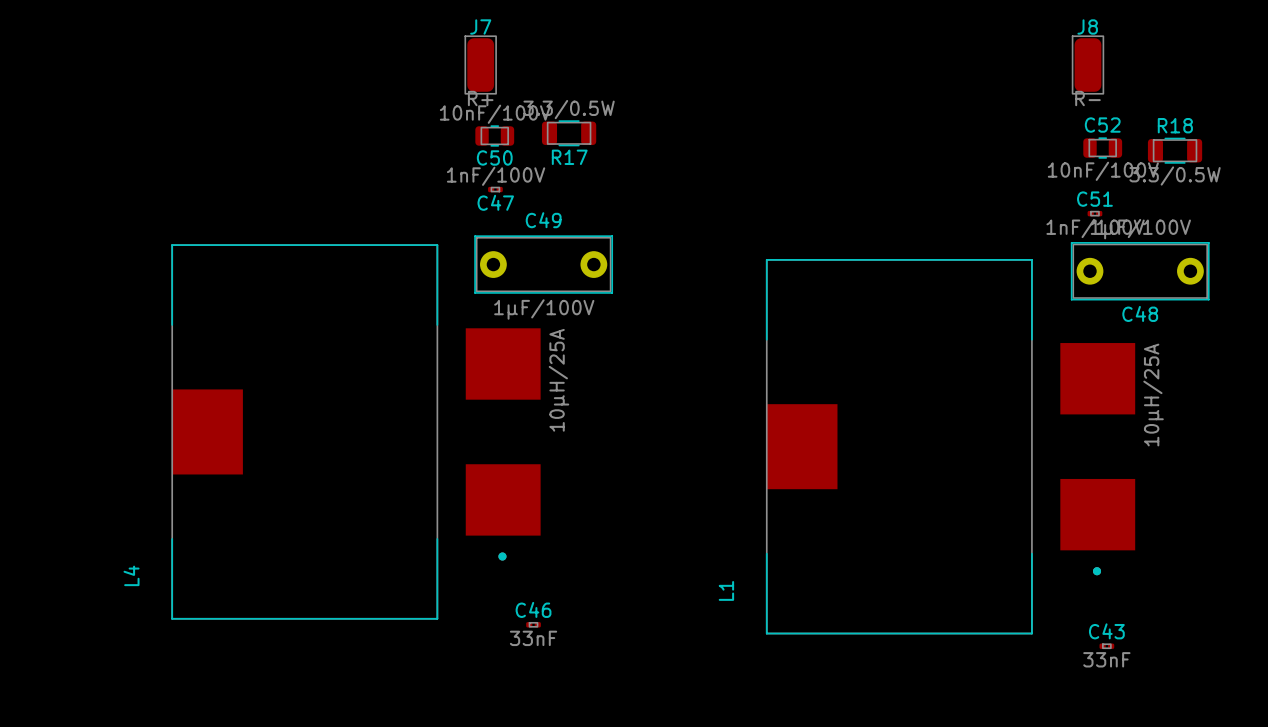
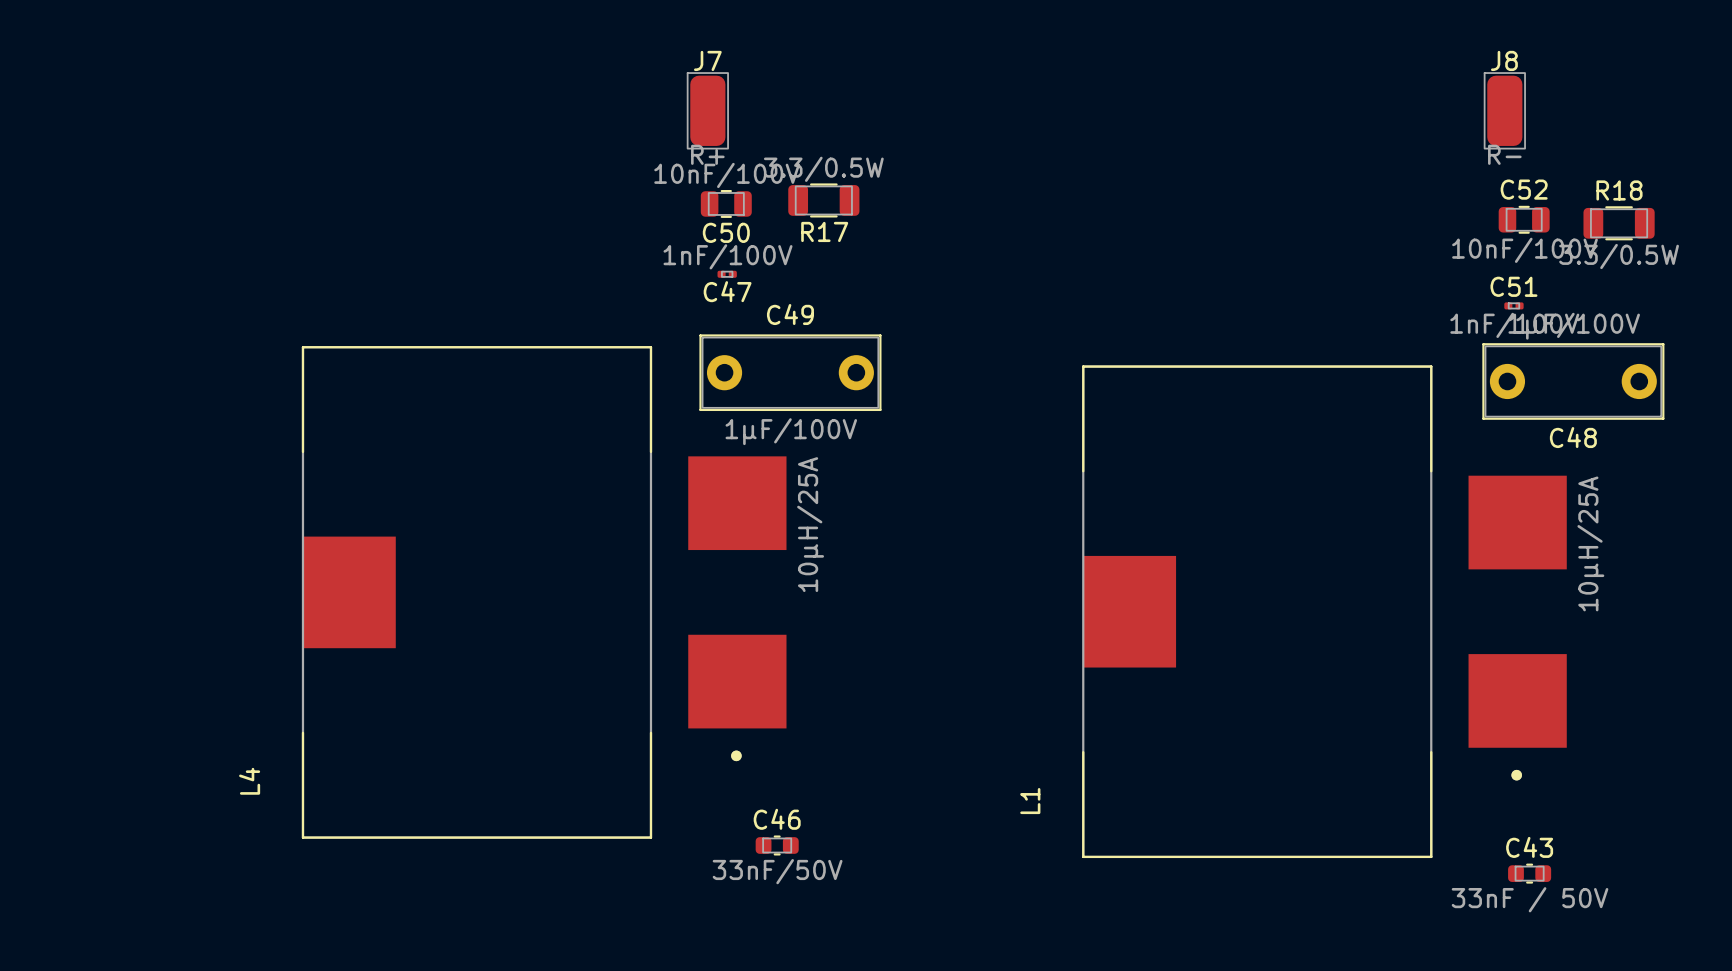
C46 footprint: [526, 622, 541, 628] -> [755, 835, 799, 856]
C46 value: 33nF (533, 638) -> 33nF/50V (777, 871)
C43 footprint: [1099, 643, 1115, 649] -> [1508, 863, 1552, 884]
C43 value: 33nF (1106, 659) -> 33nF / 50V (1530, 899)

